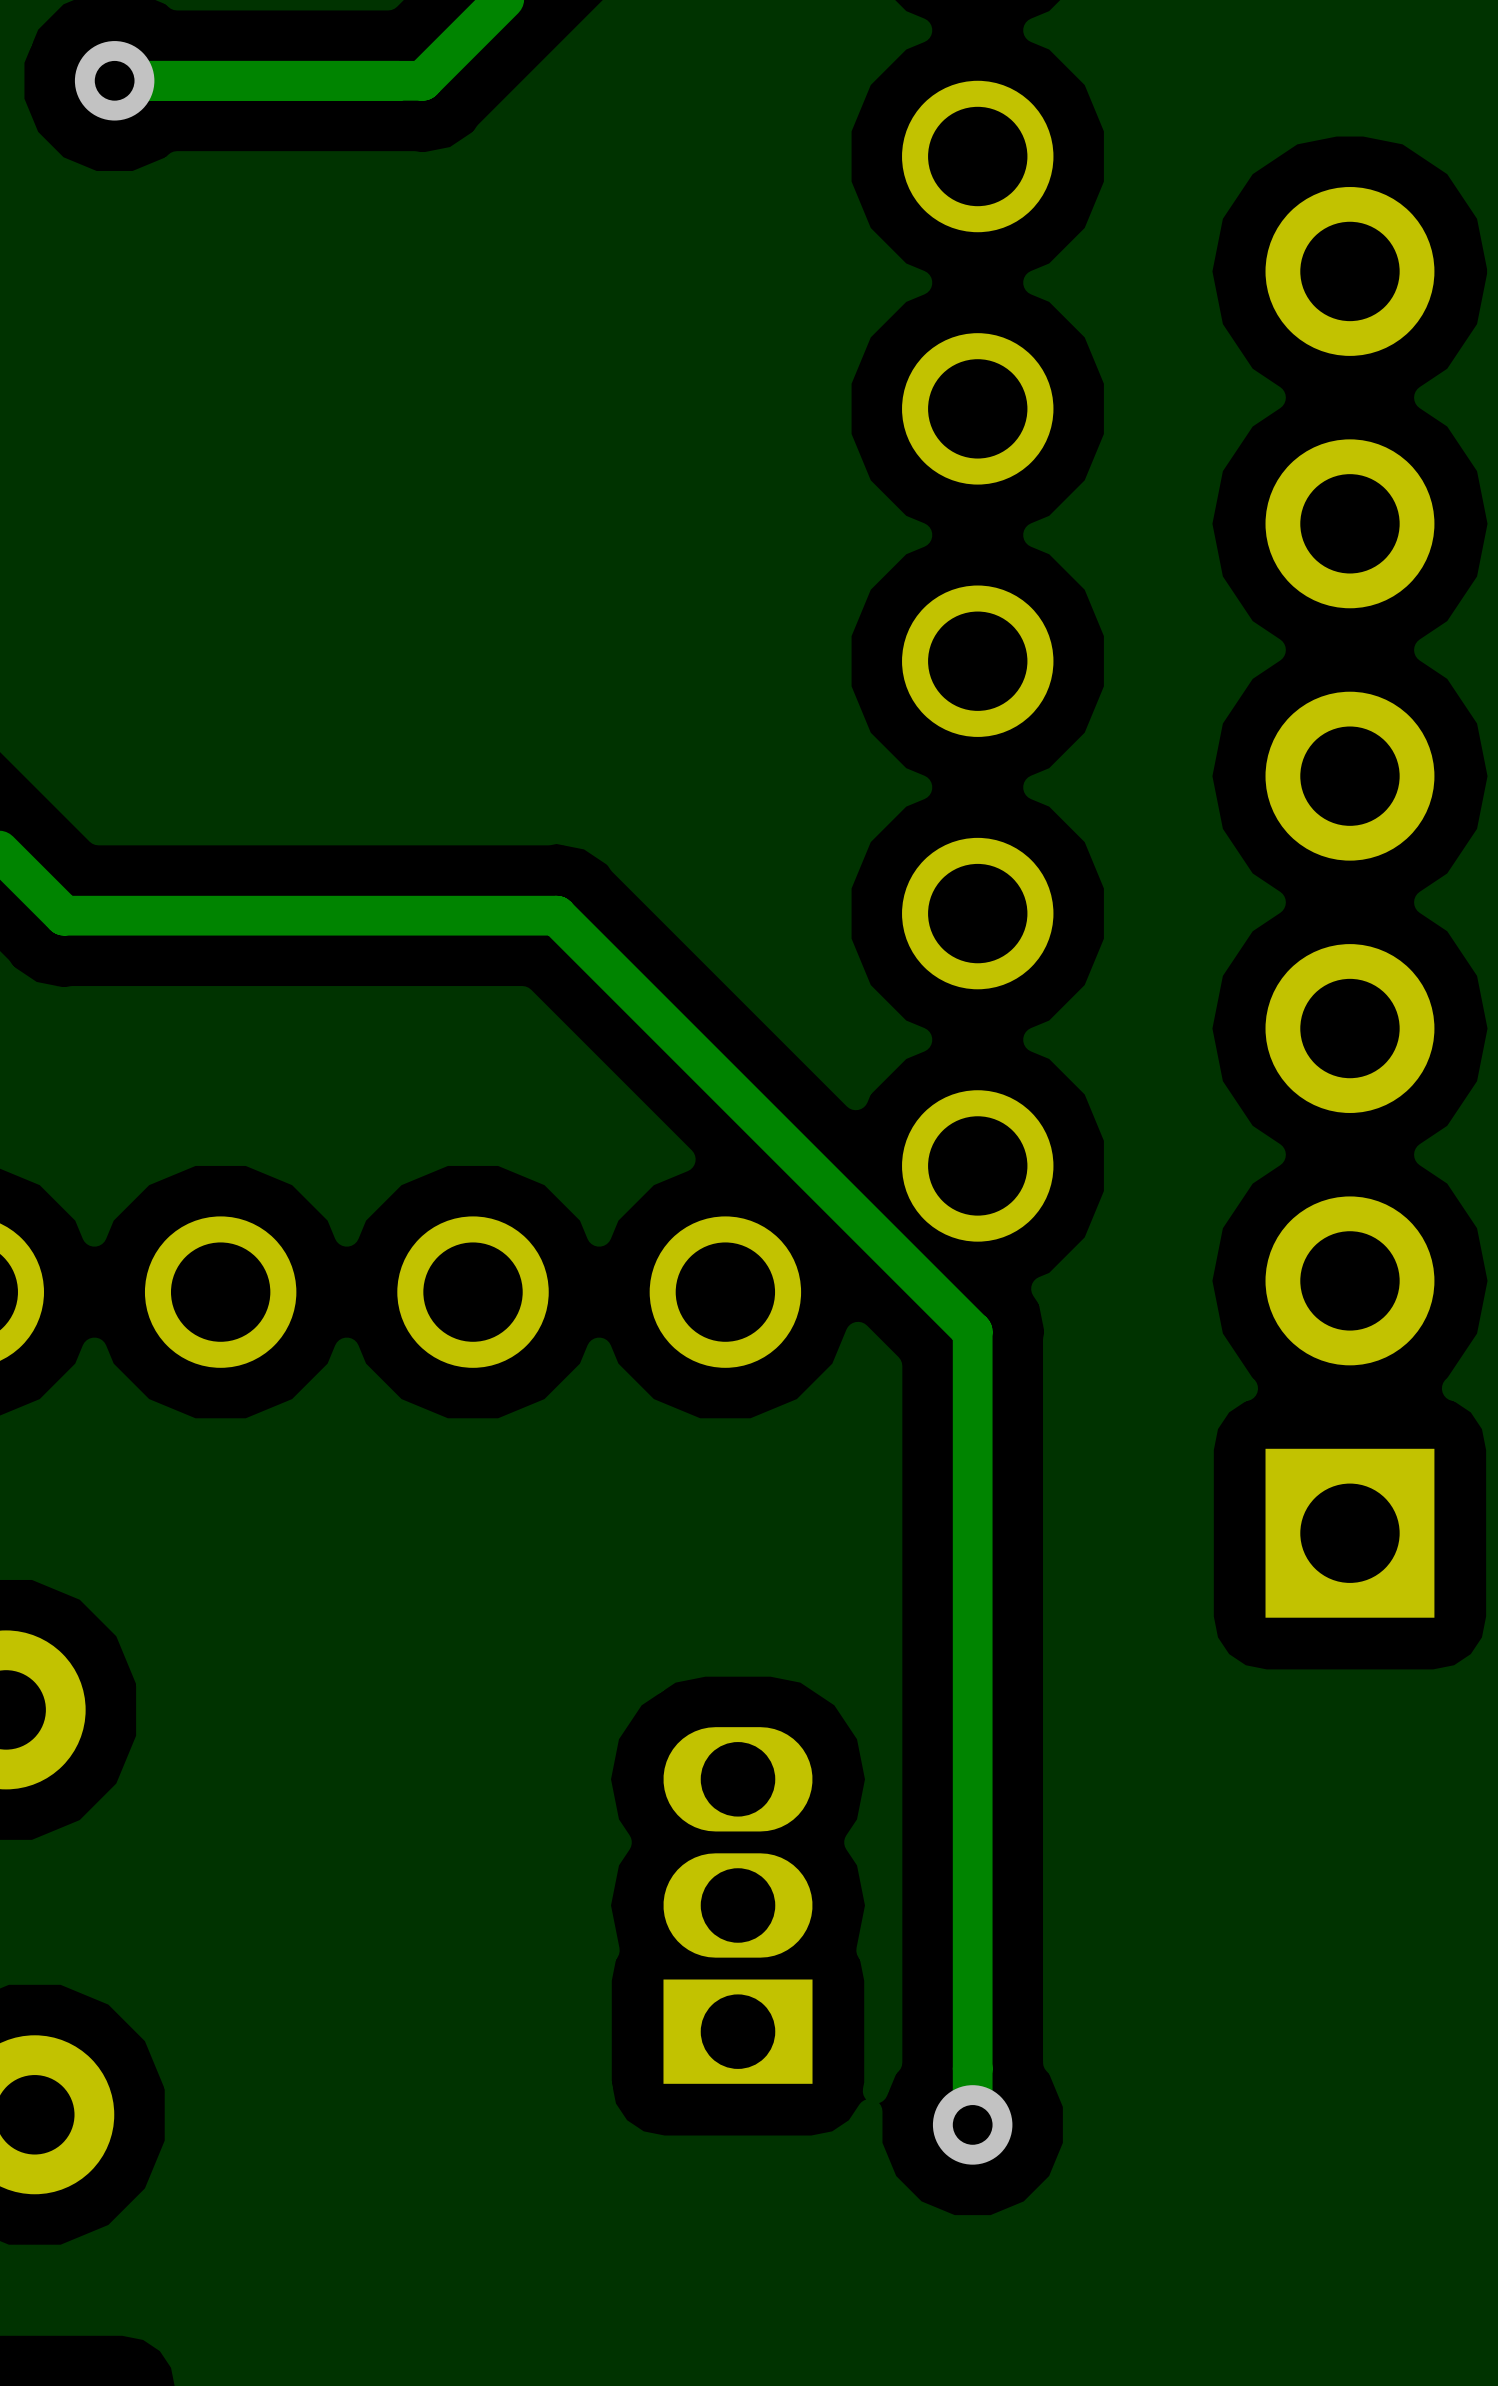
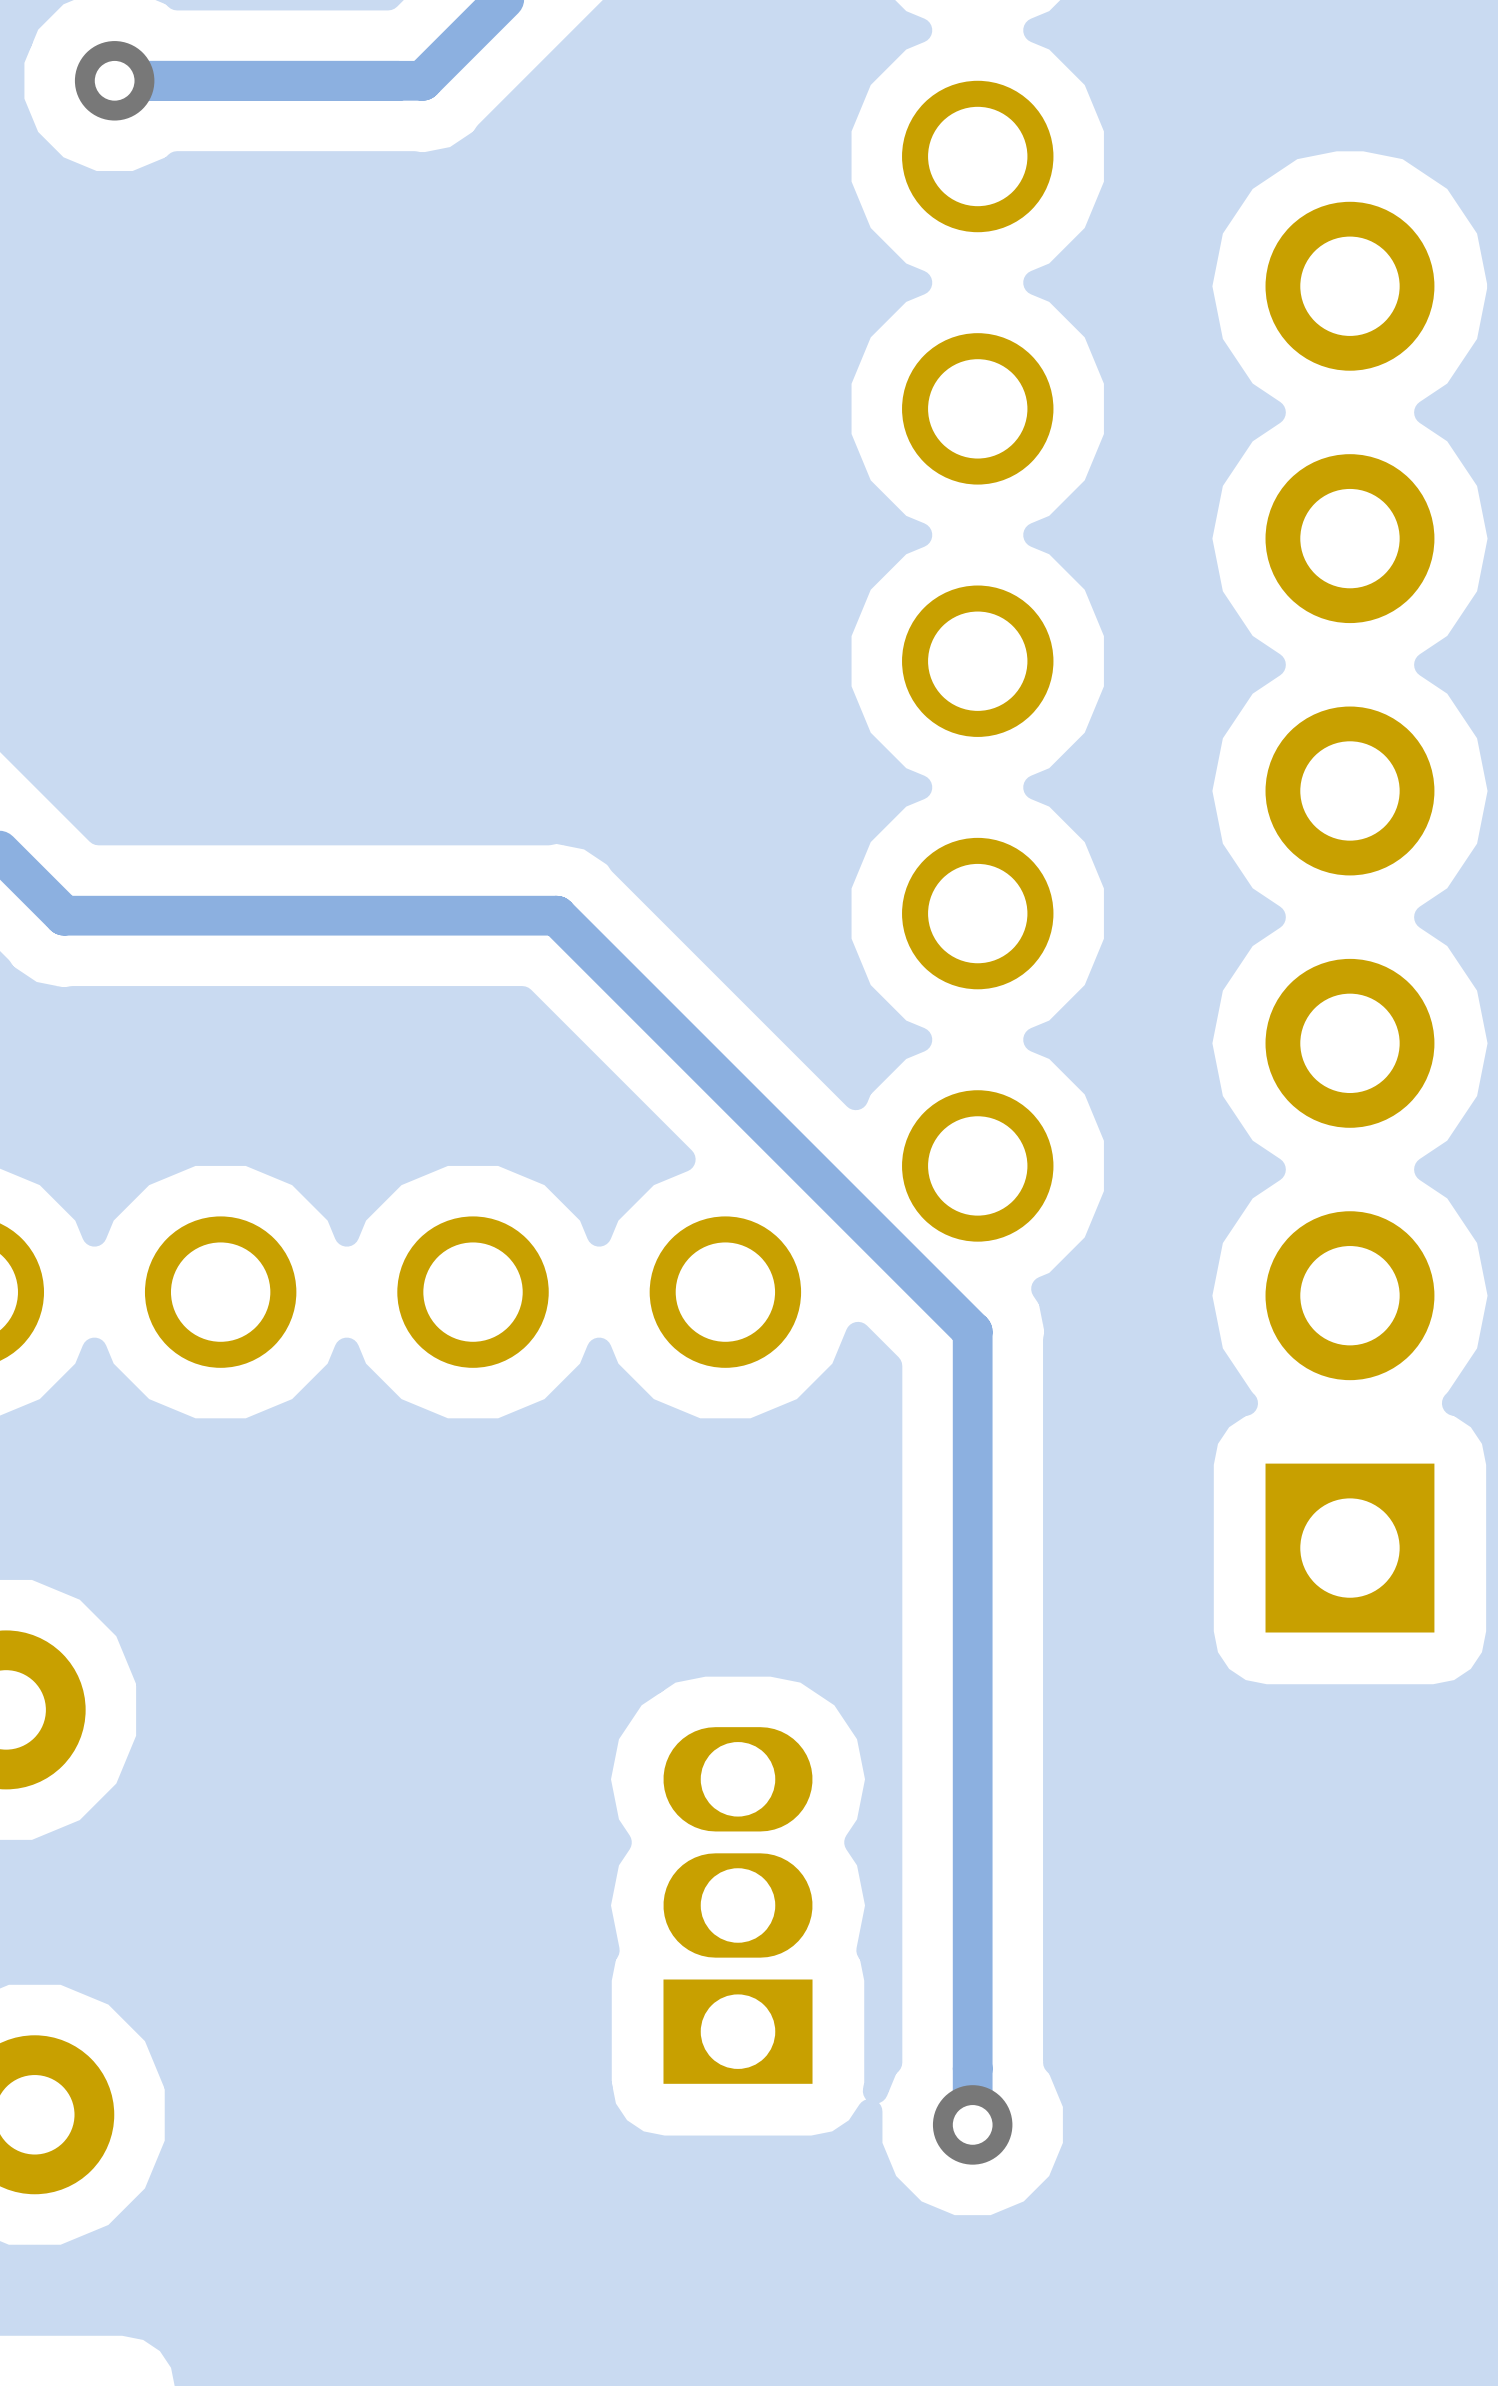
part position: (1349, 902) -> (1349, 917)

